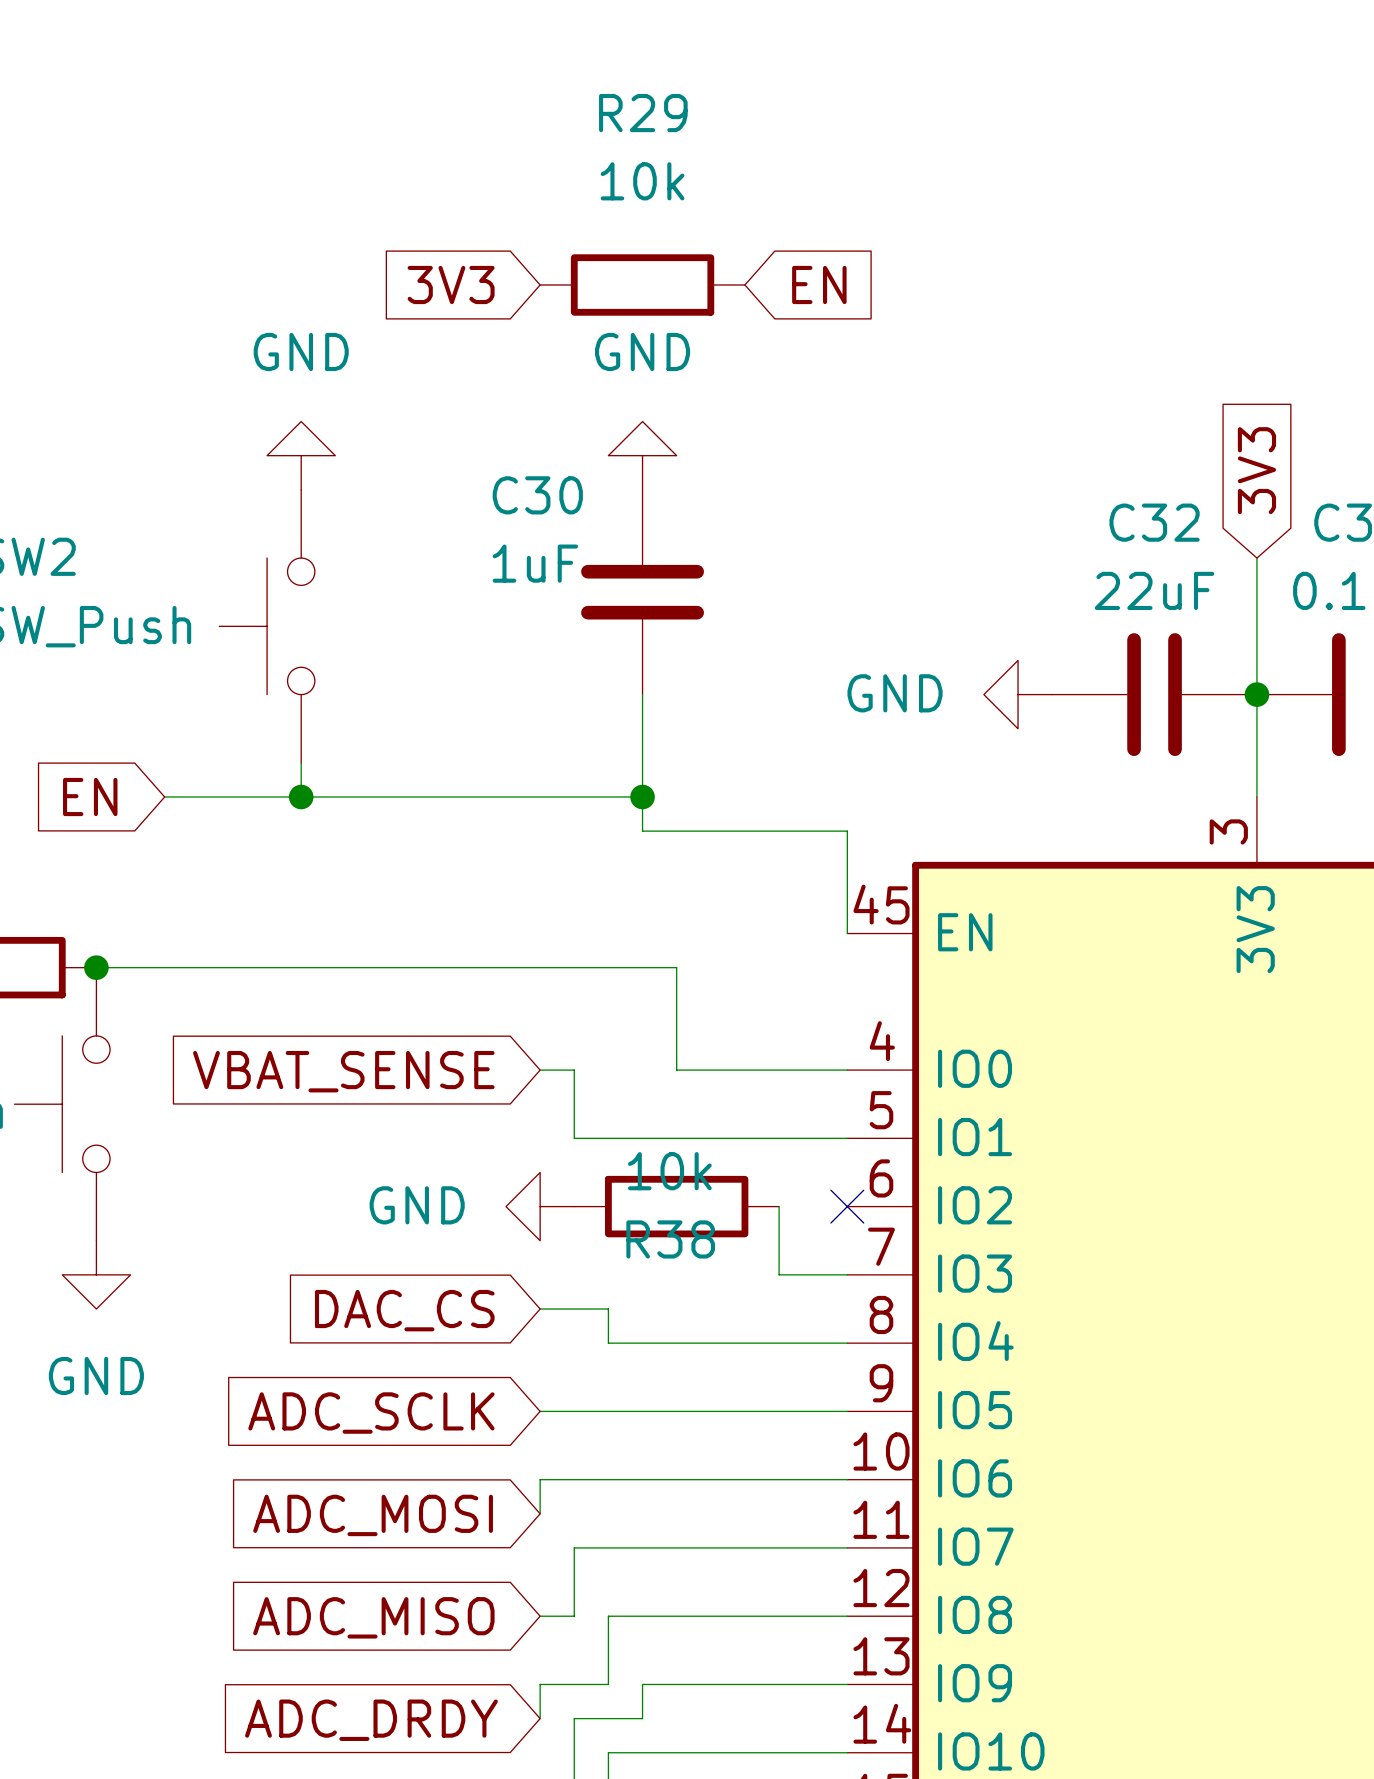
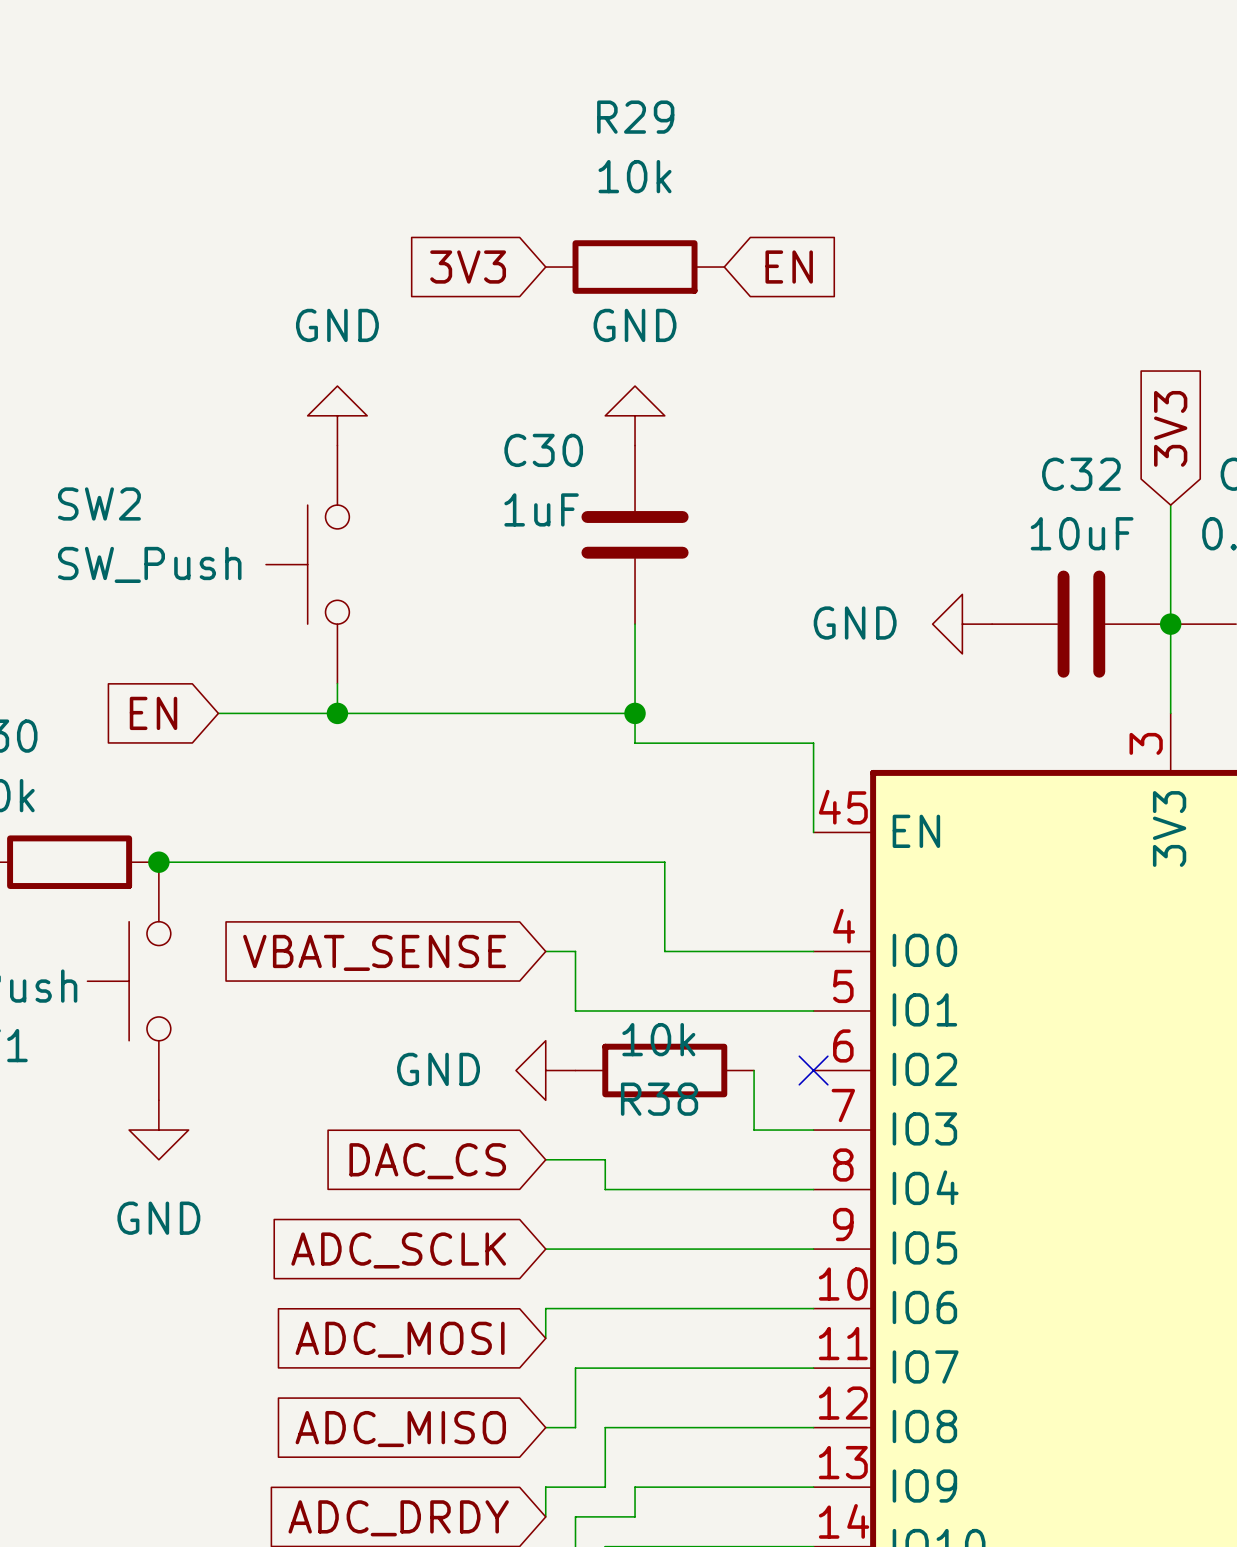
C32 value: 22uF (1154, 590) -> 10uF (1082, 533)

